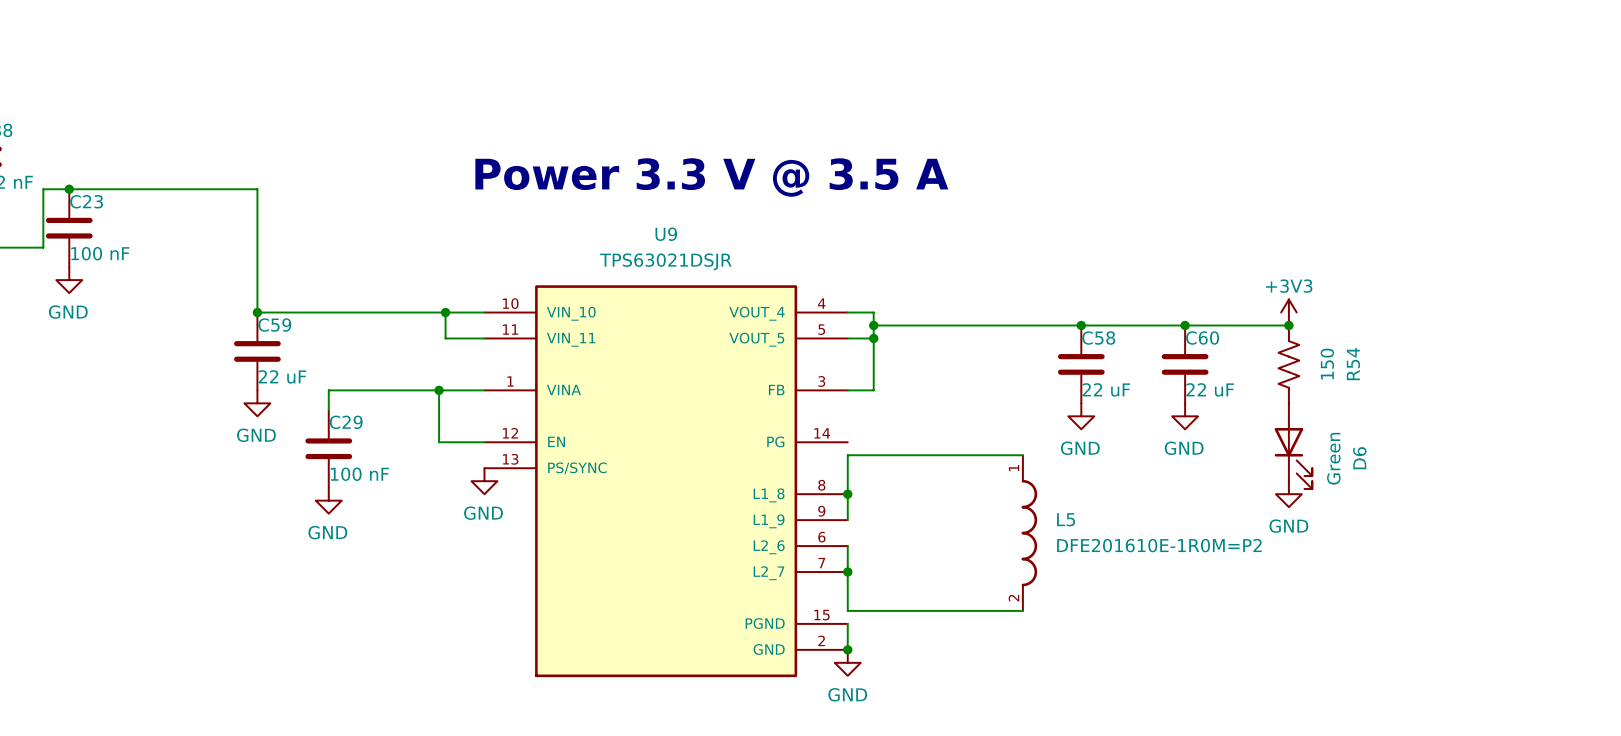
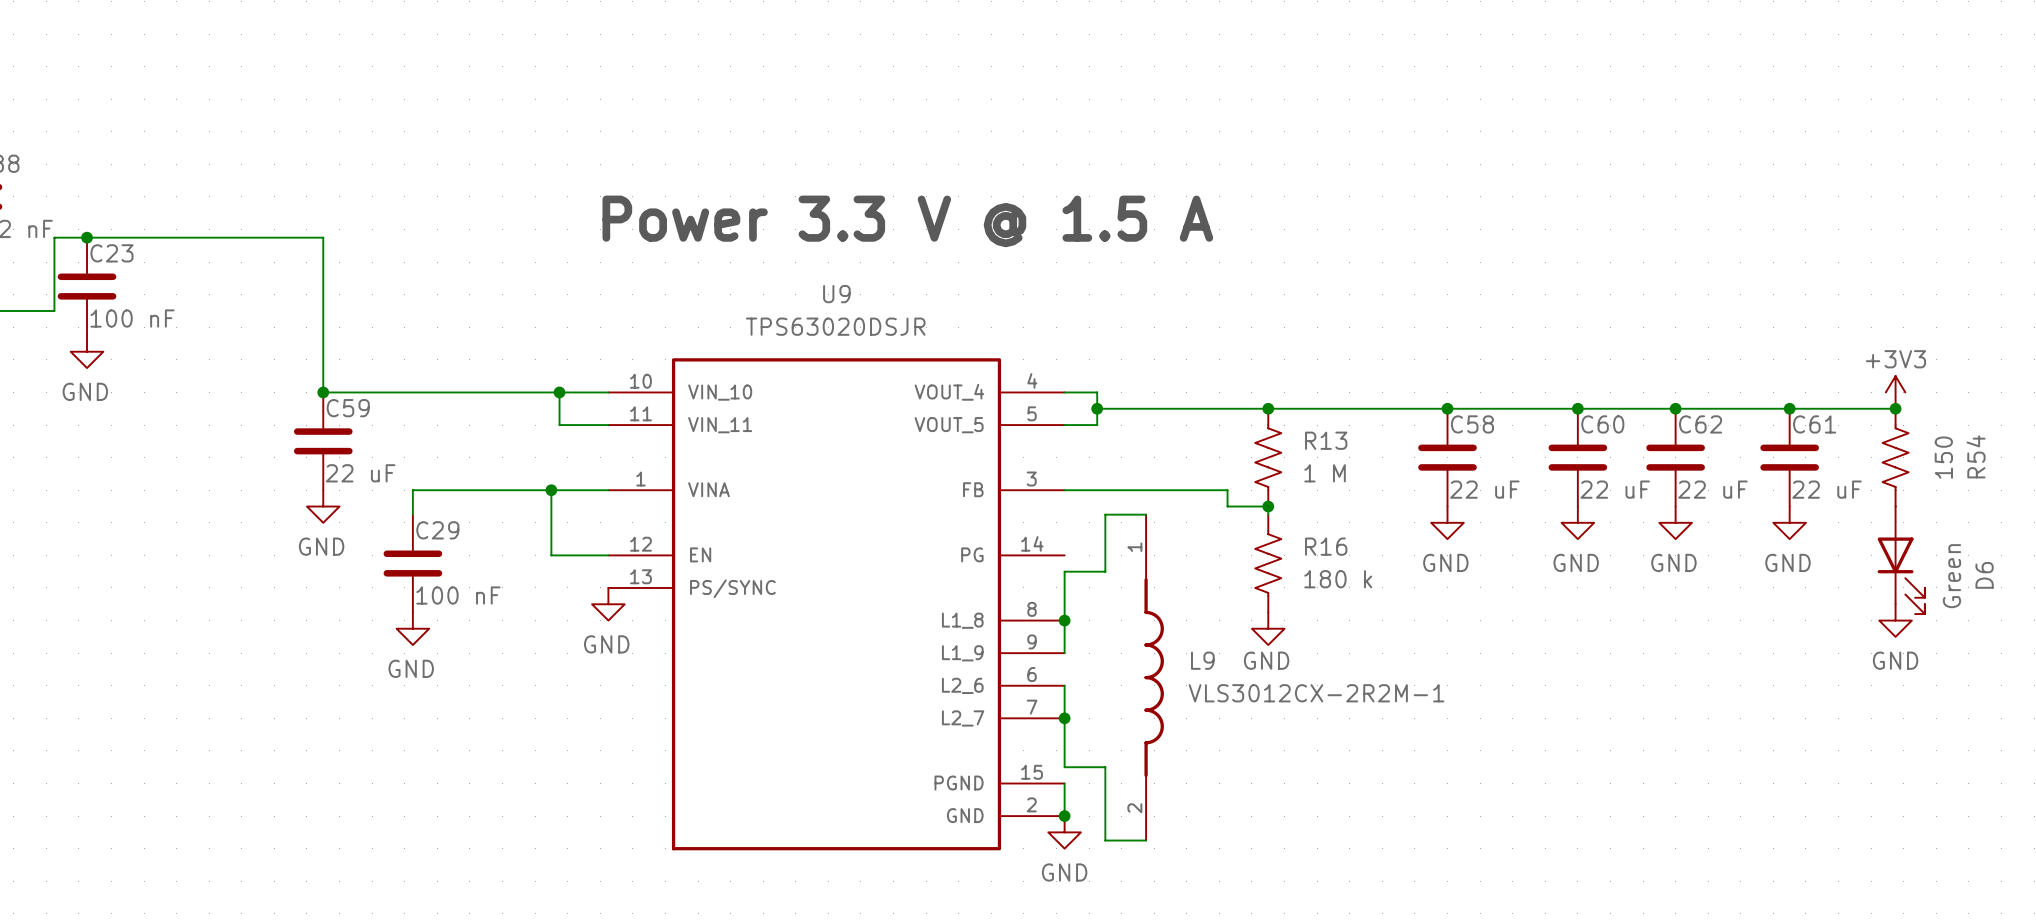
text: Power 3.3 V @ 3.5 A (711, 177) -> Power 3.3 V @ 1.5 A (907, 221)
U9 value: TPS63021DSJR (665, 261) -> TPS63020DSJR (835, 326)
power symbol position: +3V3 (1288, 312) -> +3V3 (1895, 392)
junction: none -> (1268, 408)
junction: (1081, 325) -> none
junction position: (1185, 325) -> (1447, 408)
junction: none -> (1577, 408)
wire: none -> (1618, 408) (1895, 408)
junction: (1288, 325) -> none
junction: none -> (1675, 408)
junction: none -> (1789, 408)
junction: none -> (1895, 408)
wire: (873, 338) (873, 390) -> (1268, 514) (1268, 506) (1227, 506) (1227, 490) (1097, 490)
junction: (873, 338) -> none
R13: none -> 1 M (1268, 457)
C58 position: (1081, 364) -> (1447, 457)
C60 position: (1185, 364) -> (1577, 457)
R54 position: (1288, 364) -> (1895, 457)
C62: none -> 22 uF (1675, 457)
C61: none -> 22 uF (1789, 457)
junction: none -> (1268, 506)
power symbol: GND (1081, 416) -> none
power symbol position: GND (1185, 416) -> GND (1447, 522)
power symbol: none -> GND (1577, 522)
power symbol: none -> GND (1675, 522)
power symbol: none -> GND (1789, 522)
D6 position: (1293, 446) -> (1901, 560)
R16: none -> 180 k (1268, 563)
wire: (880, 455) (1022, 455) -> (1105, 571) (1105, 514) (1146, 514)
power symbol: GND (1288, 494) -> none
power symbol: none -> GND (1895, 620)
power symbol: none -> GND (1268, 628)
L5: DFE201610E-1R0M=P2 (1029, 533) -> none
L9: none -> VLS3012CX-2R2M-1 (1154, 677)
wire: (880, 610) (1022, 610) -> (1105, 767) (1105, 840) (1146, 840)

